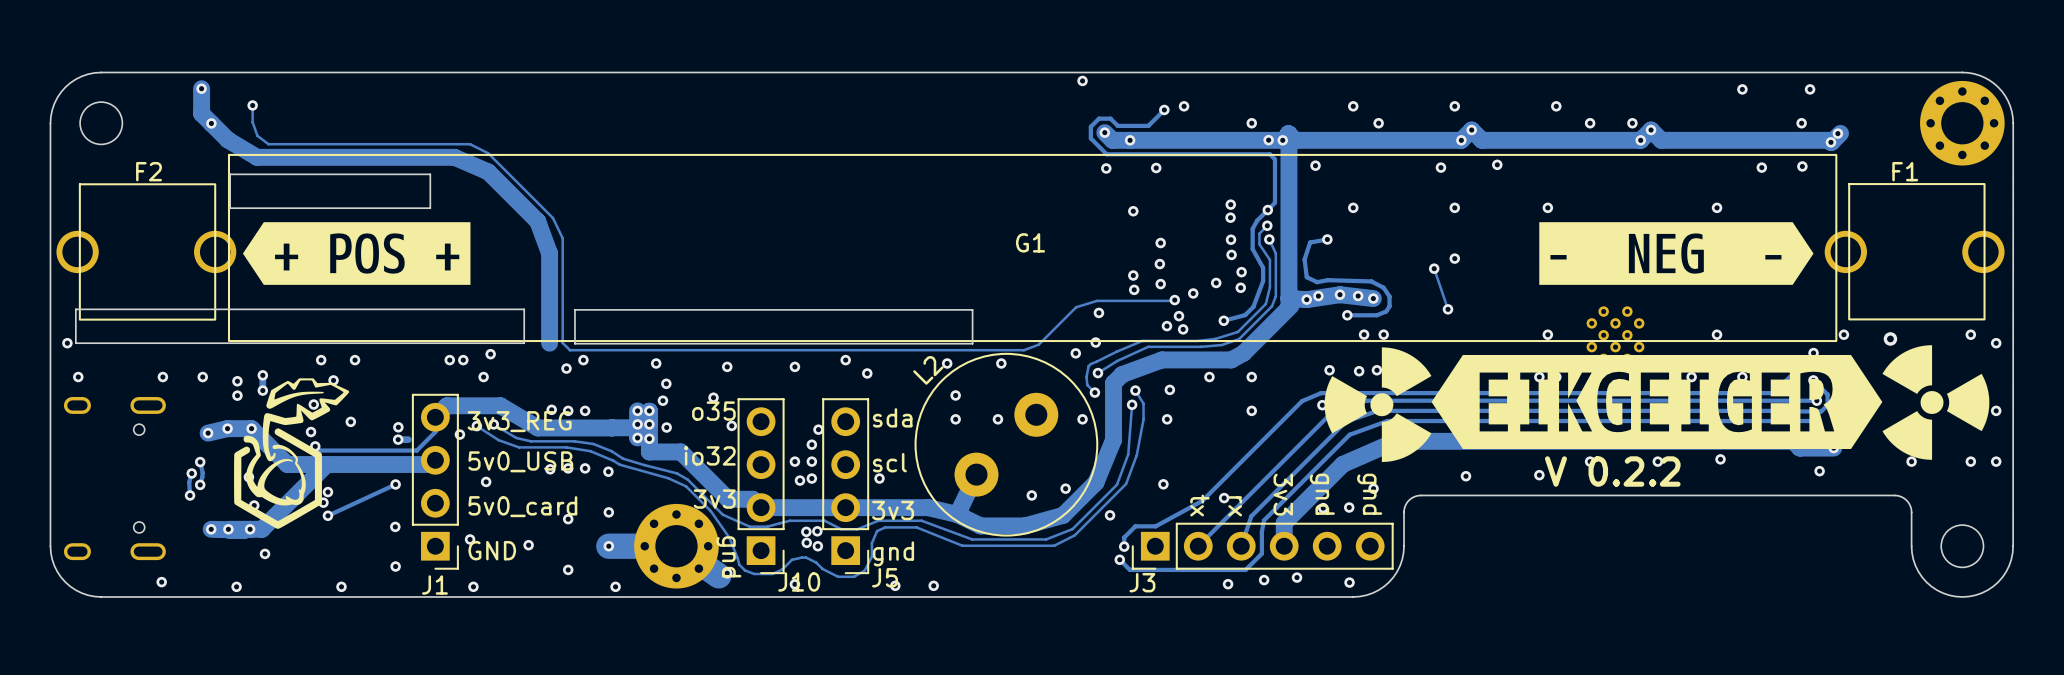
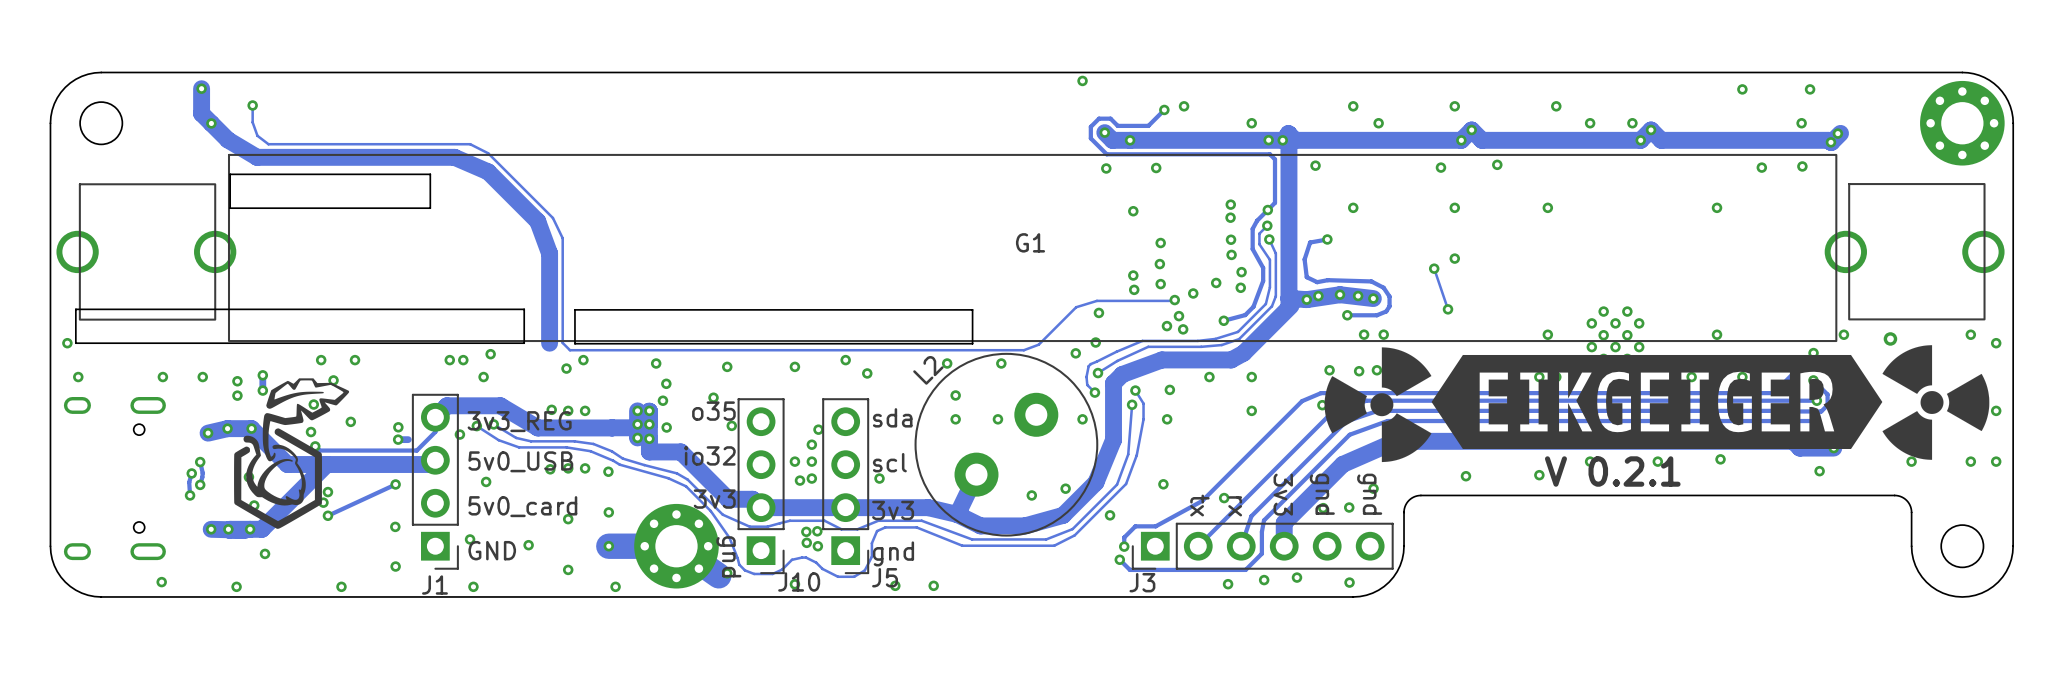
F2: (149, 171) -> none
F1: (1905, 171) -> none
drawing: [242, 222, 471, 285] -> none
drawing: [1539, 222, 1814, 285] -> none
text: V 0.2.2 (1612, 471) -> V 0.2.1 (1612, 471)

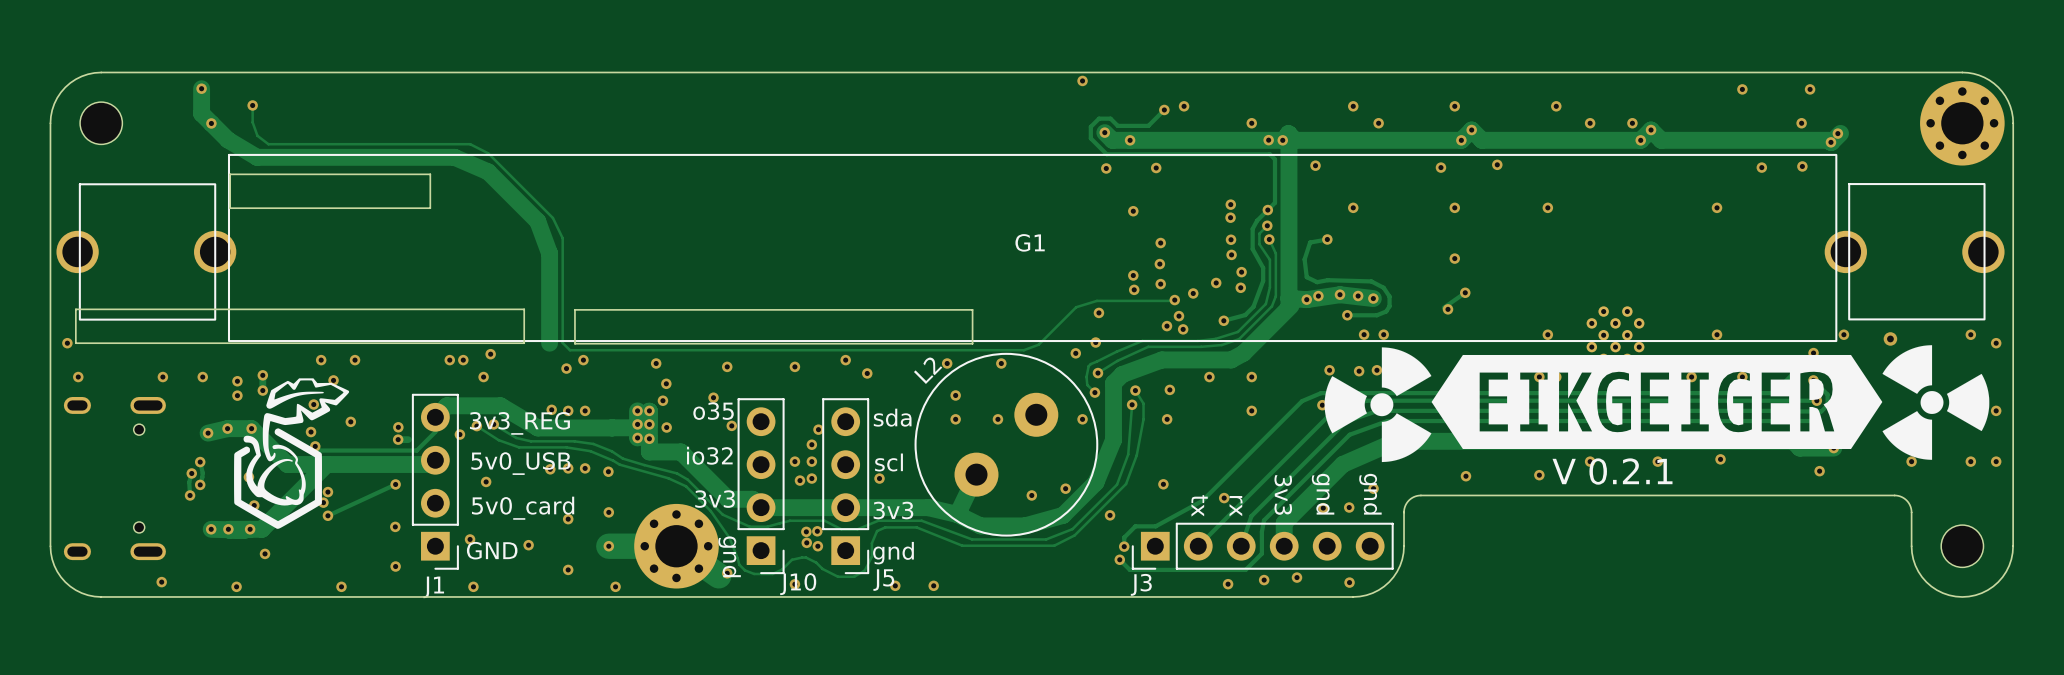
track: (1434, 268) (1448, 309) -> none
via position: (1434, 268) -> (1465, 292)
track: none -> (1465, 292) (1443, 307)

